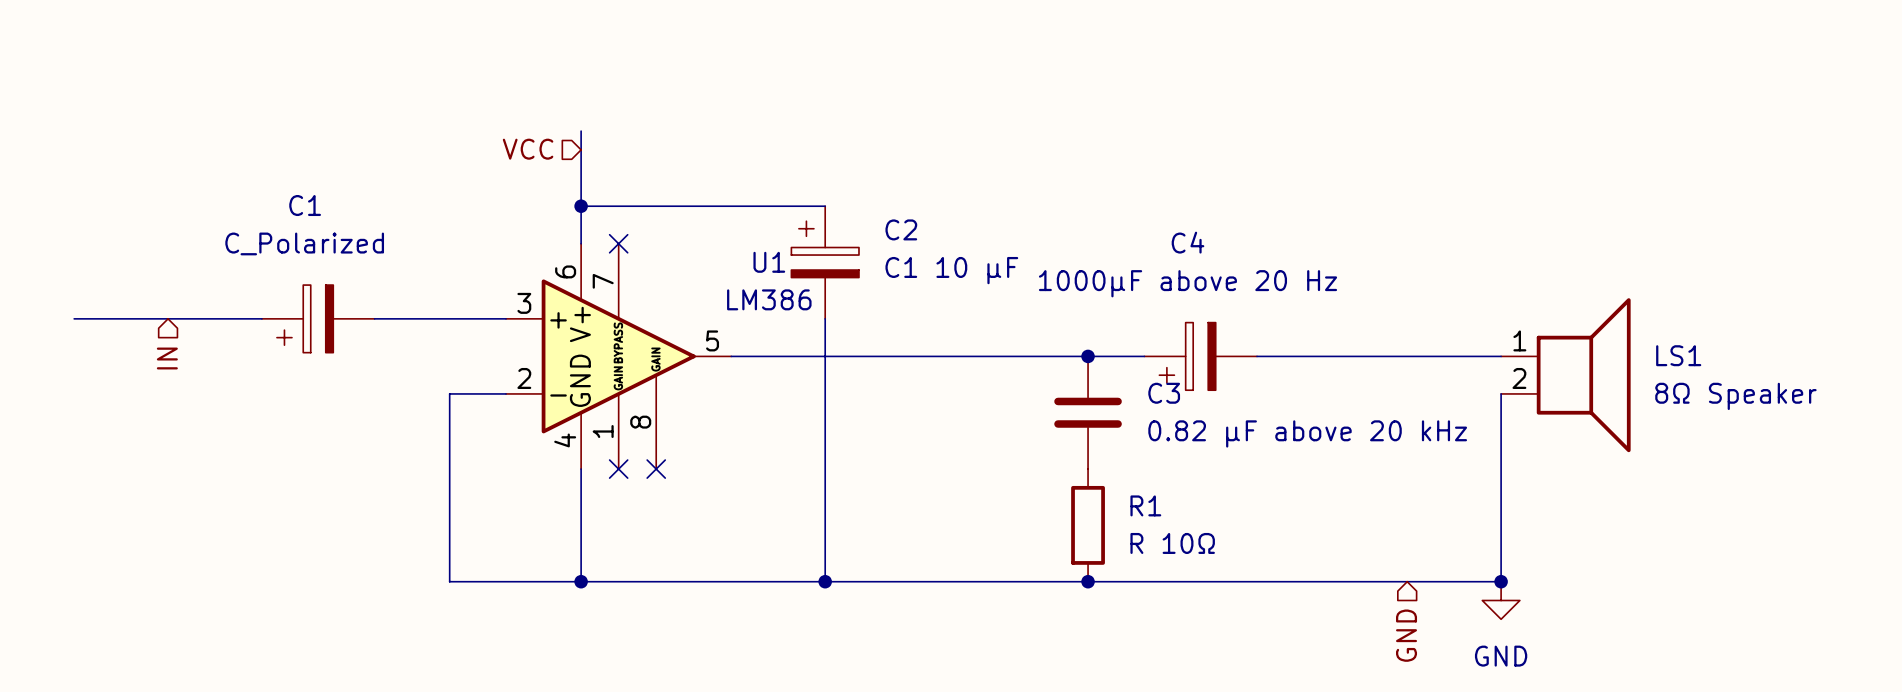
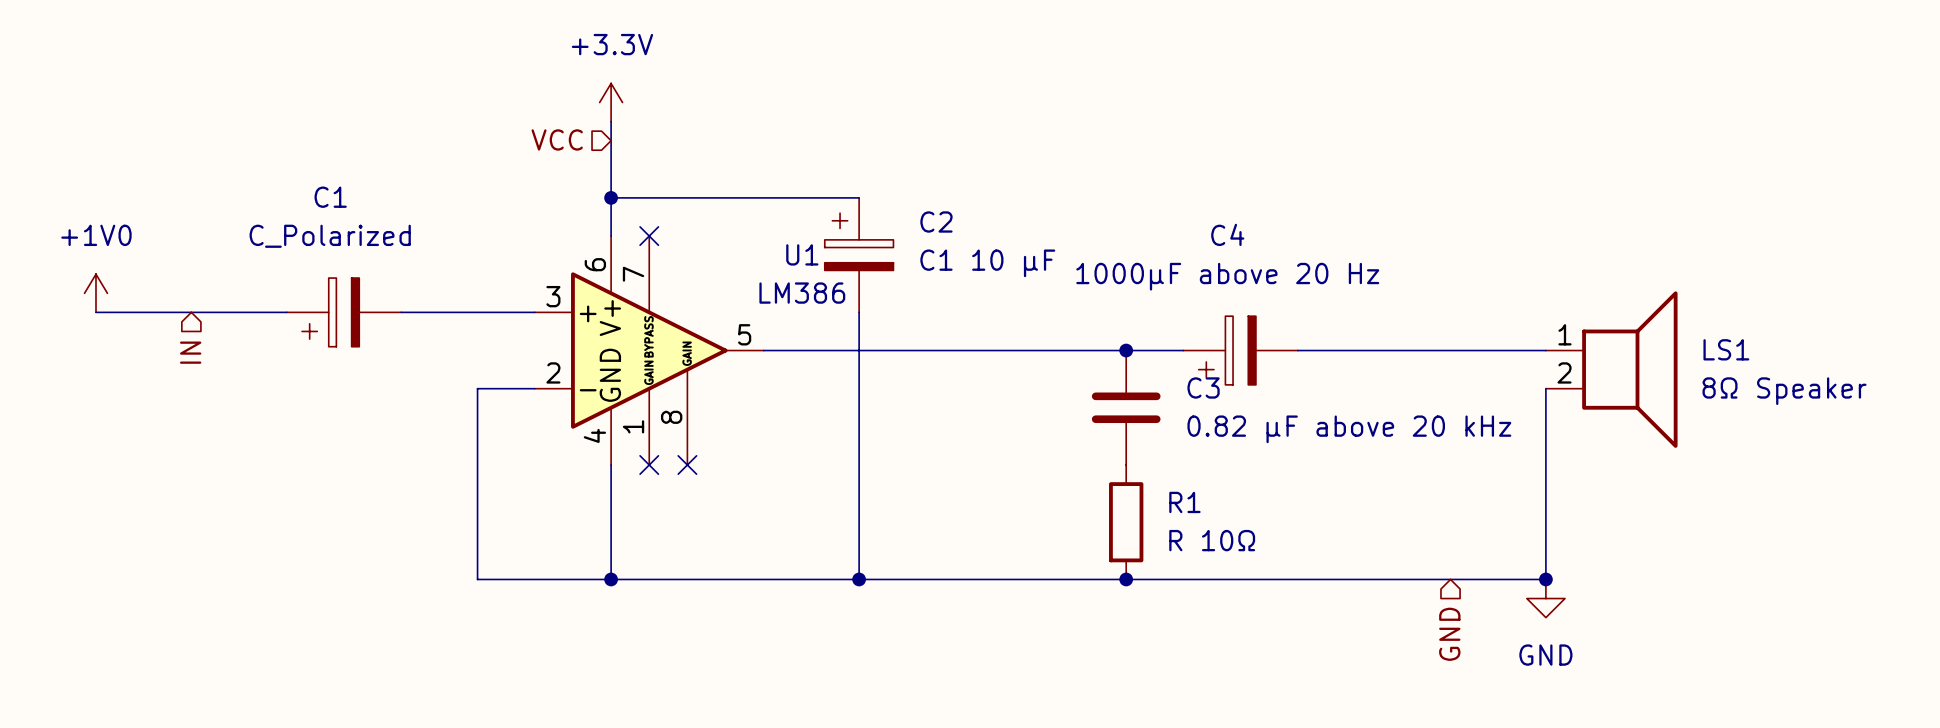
power symbol: none -> +3.3V (611, 102)
power symbol: none -> +1V0 (95, 293)

